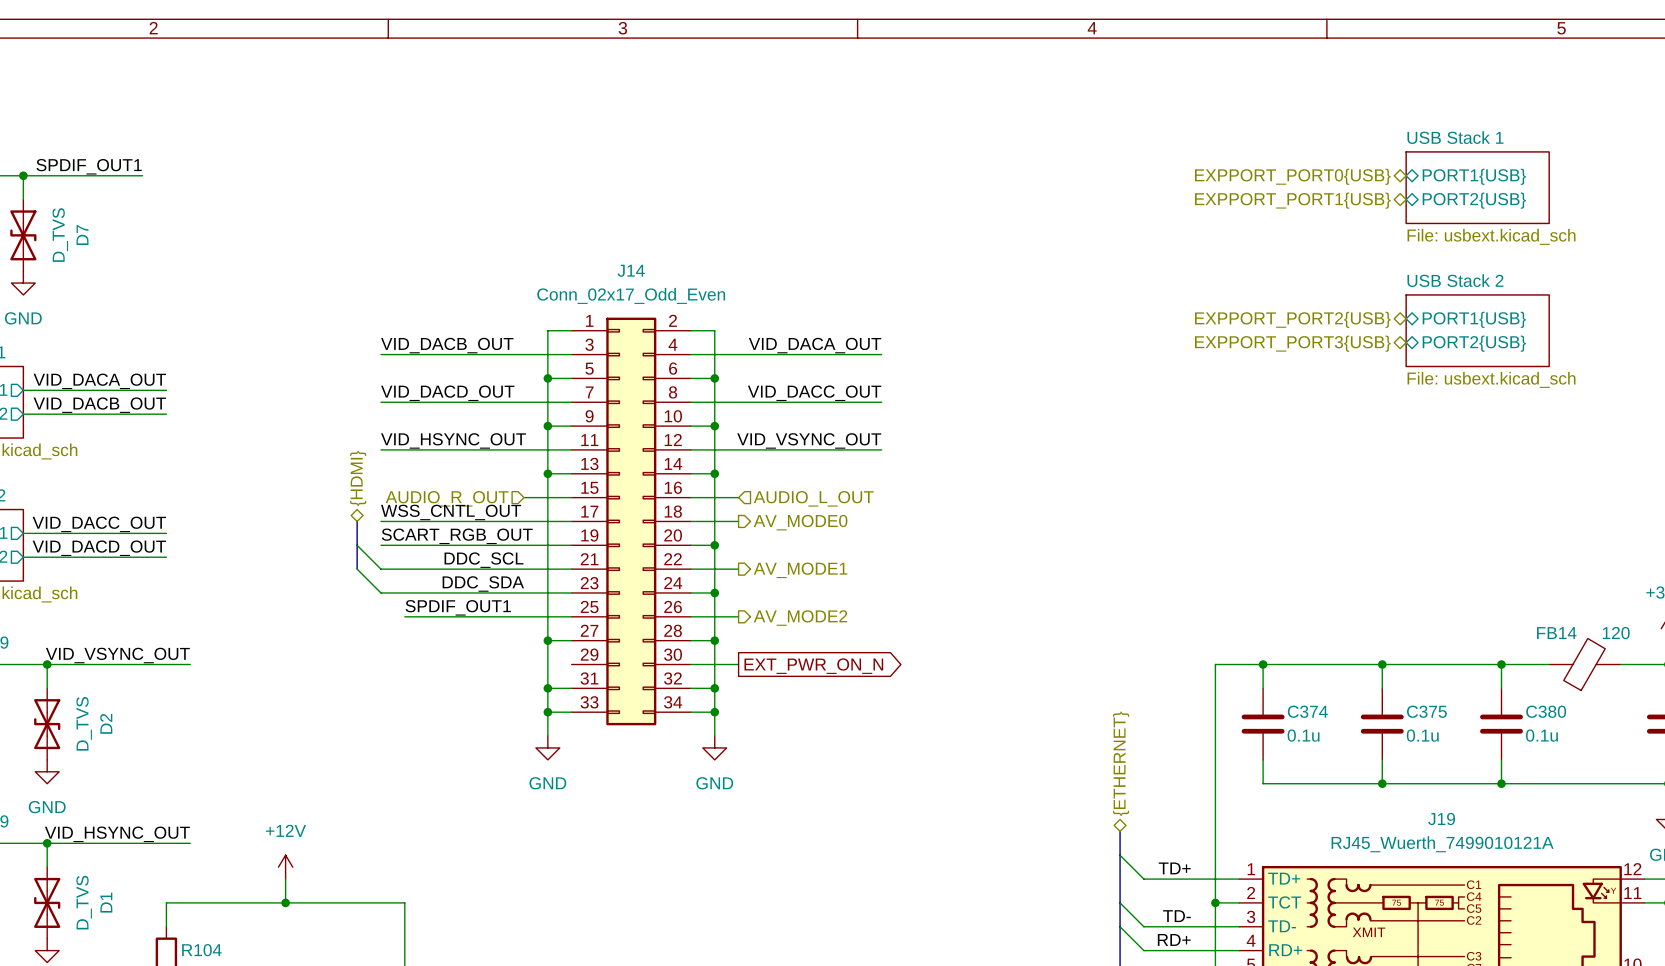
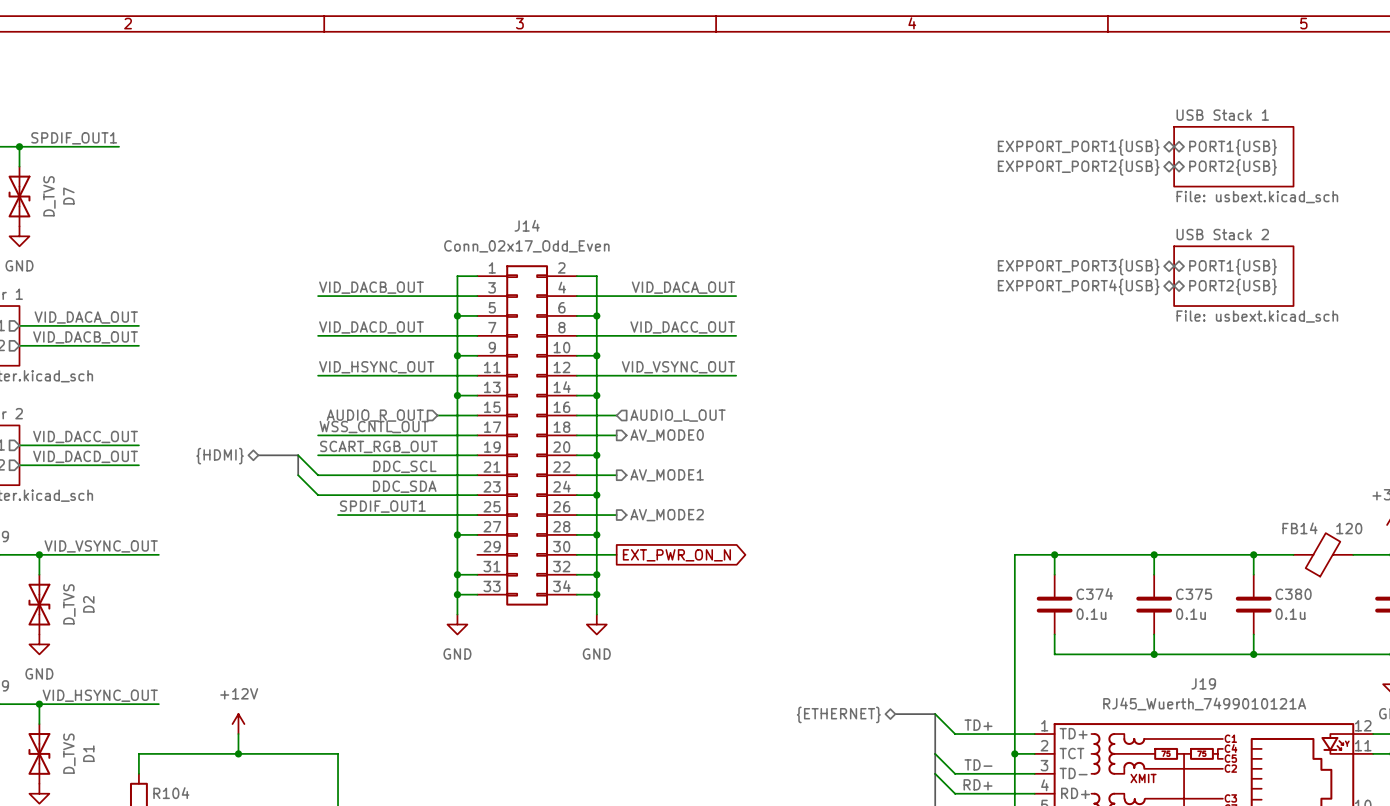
hierarchical label: EXPPORT_PORT0{USB} (1292, 176) -> EXPPORT_PORT1{USB} (1078, 147)
hierarchical label: EXPPORT_PORT1{USB} (1292, 200) -> EXPPORT_PORT2{USB} (1078, 167)
hierarchical label: EXPPORT_PORT2{USB} (1292, 319) -> EXPPORT_PORT3{USB} (1078, 267)
hierarchical label: EXPPORT_PORT3{USB} (1292, 343) -> EXPPORT_PORT4{USB} (1078, 286)
hierarchical label rotation: 0° (358, 478) -> 90° counterclockwise (220, 456)
hierarchical label position: {HDMI} (358, 478) -> {HDMI} (220, 456)
bus: (357, 521) (357, 545) -> (258, 455) (298, 455)
hierarchical label rotation: 0° (1121, 763) -> 90° counterclockwise (838, 714)
hierarchical label position: {ETHERNET} (1121, 763) -> {ETHERNET} (838, 714)
bus: (1120, 831) (1120, 855) -> (895, 714) (935, 714)

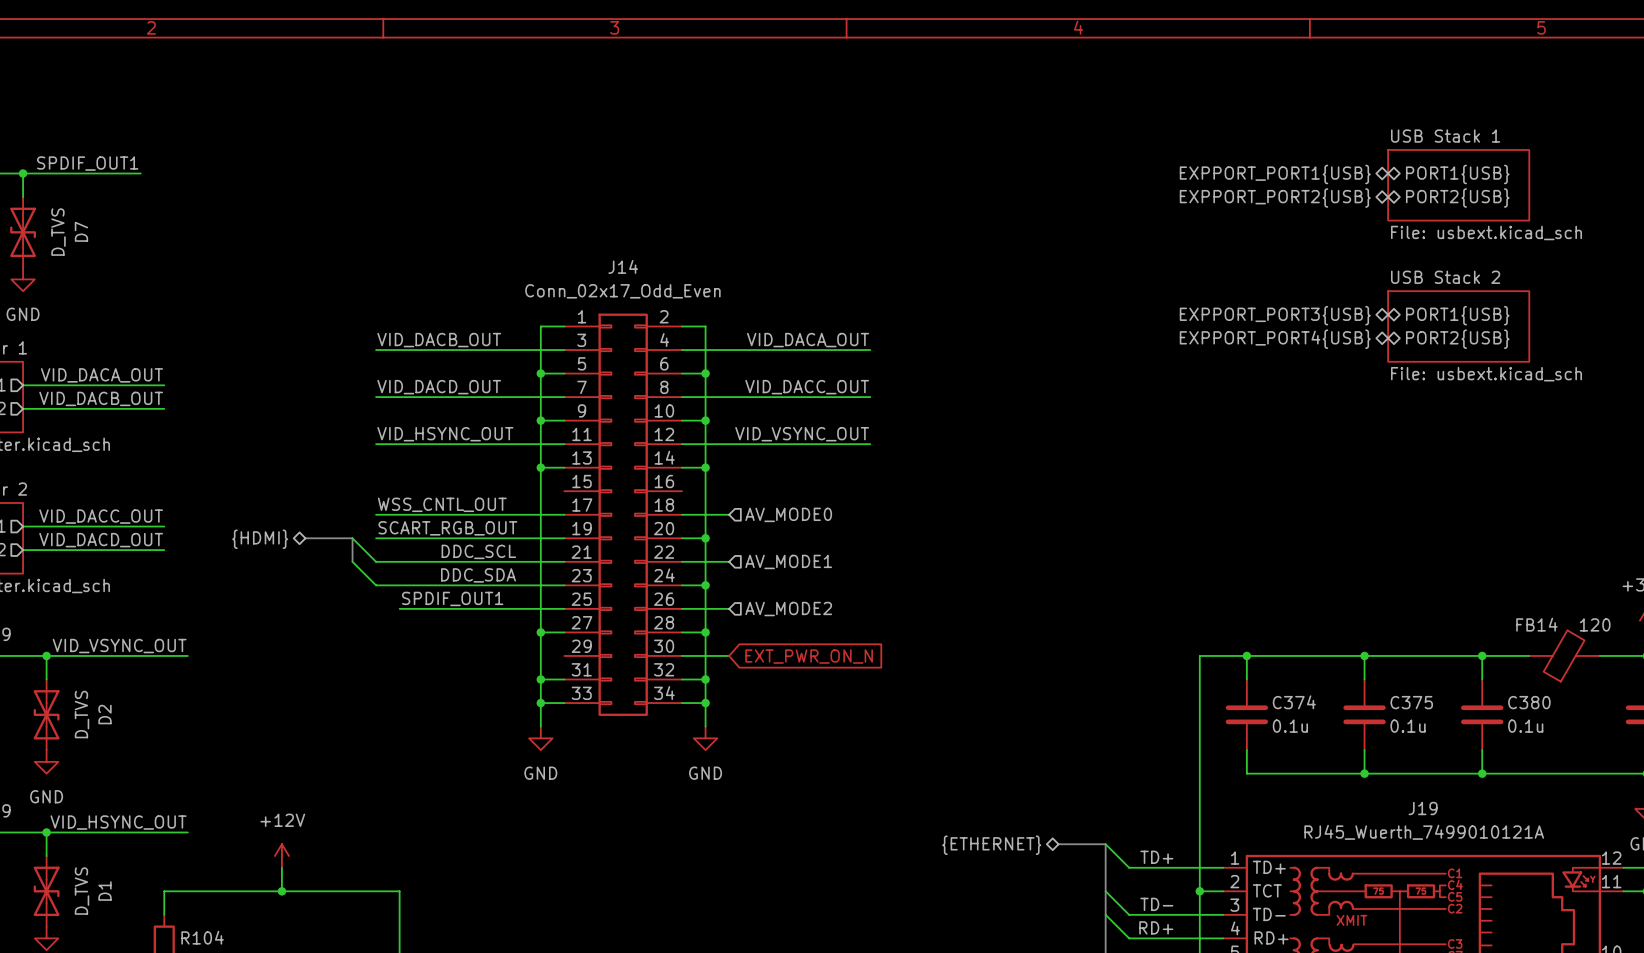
hierarchical label: AUDIO_R_OUT (375, 415) -> none
wire: (437, 415) (477, 415) -> none
wire: (576, 415) (616, 415) -> none
hierarchical label: AUDIO_L_OUT (678, 415) -> none
hierarchical label shape: output (667, 435) -> input (788, 514)
hierarchical label shape: output (667, 475) -> input (788, 561)
hierarchical label shape: output (667, 515) -> input (788, 609)
global label shape: output (676, 555) -> input (809, 656)

